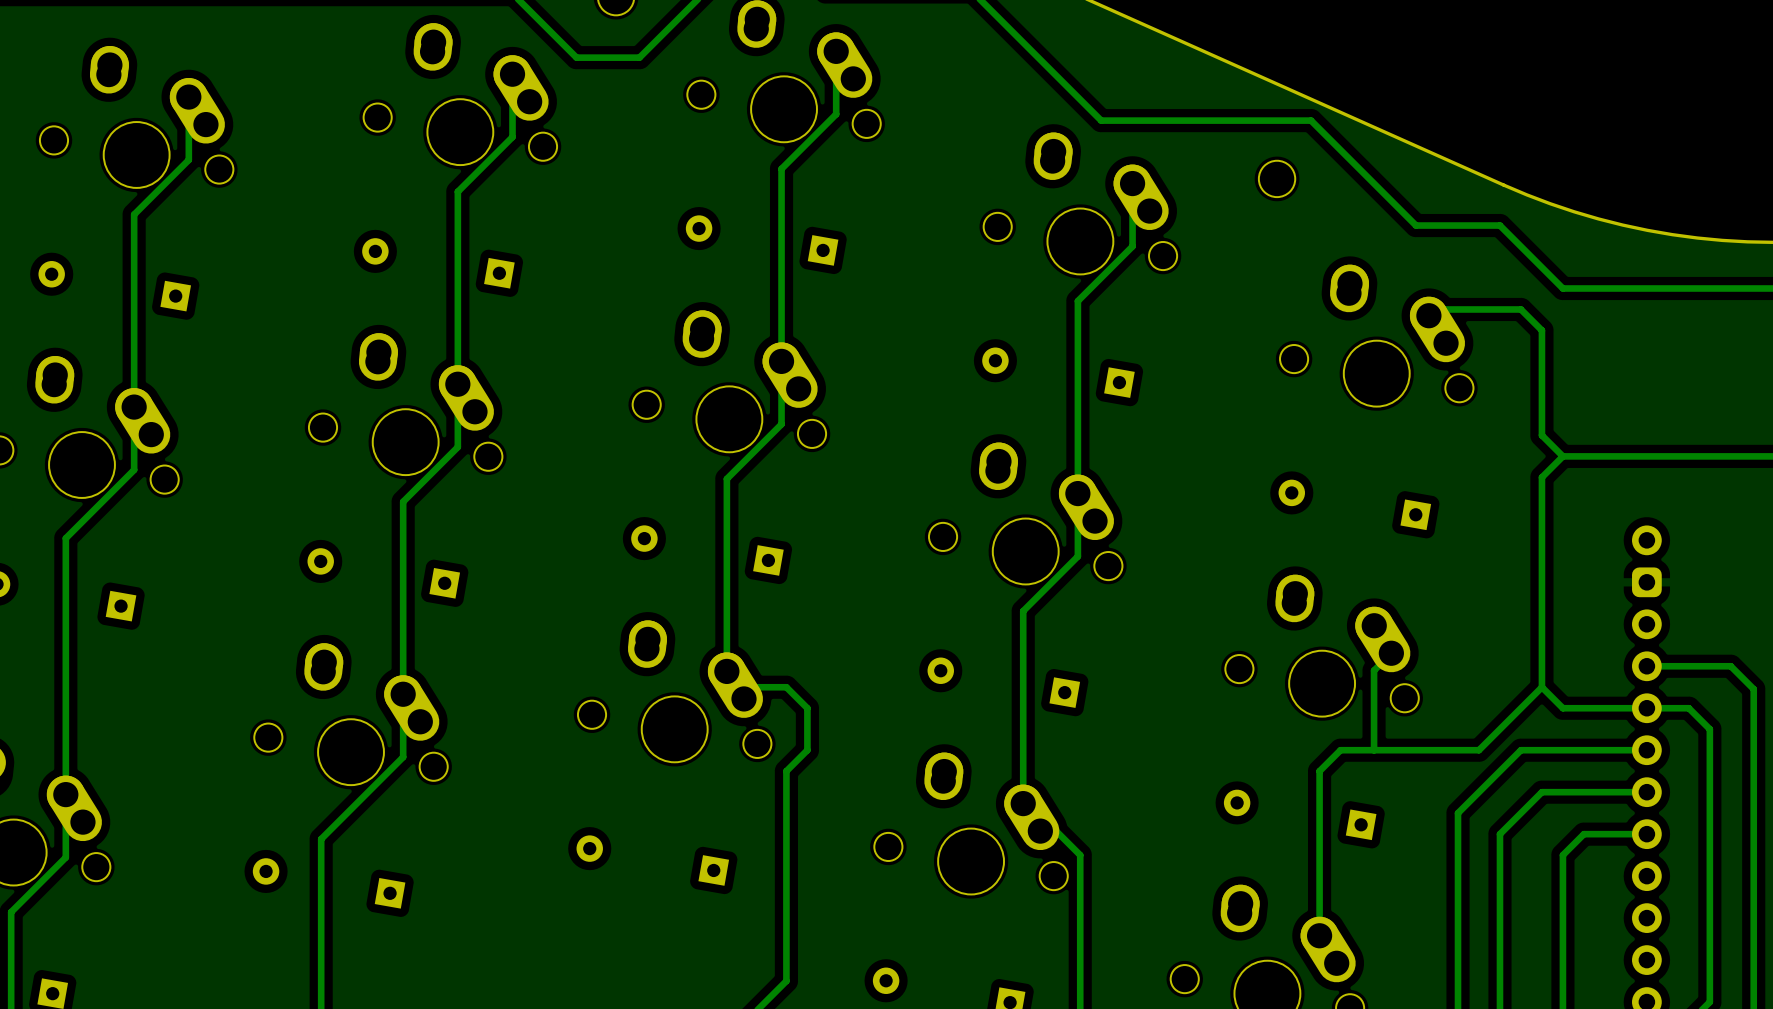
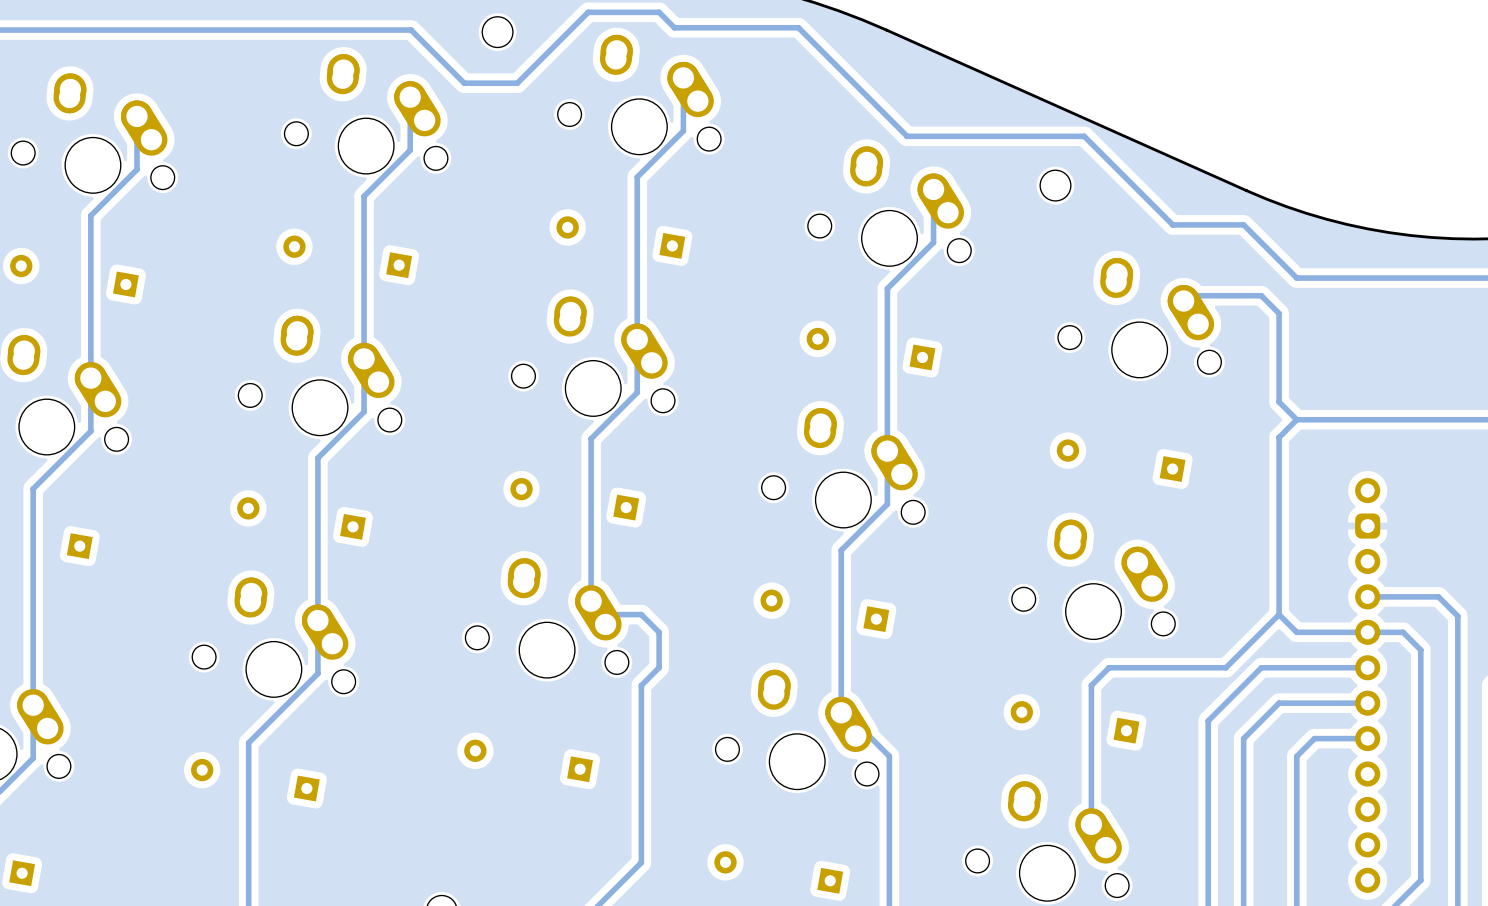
track: (1391, 653) (1374, 670) (1374, 750) -> none

